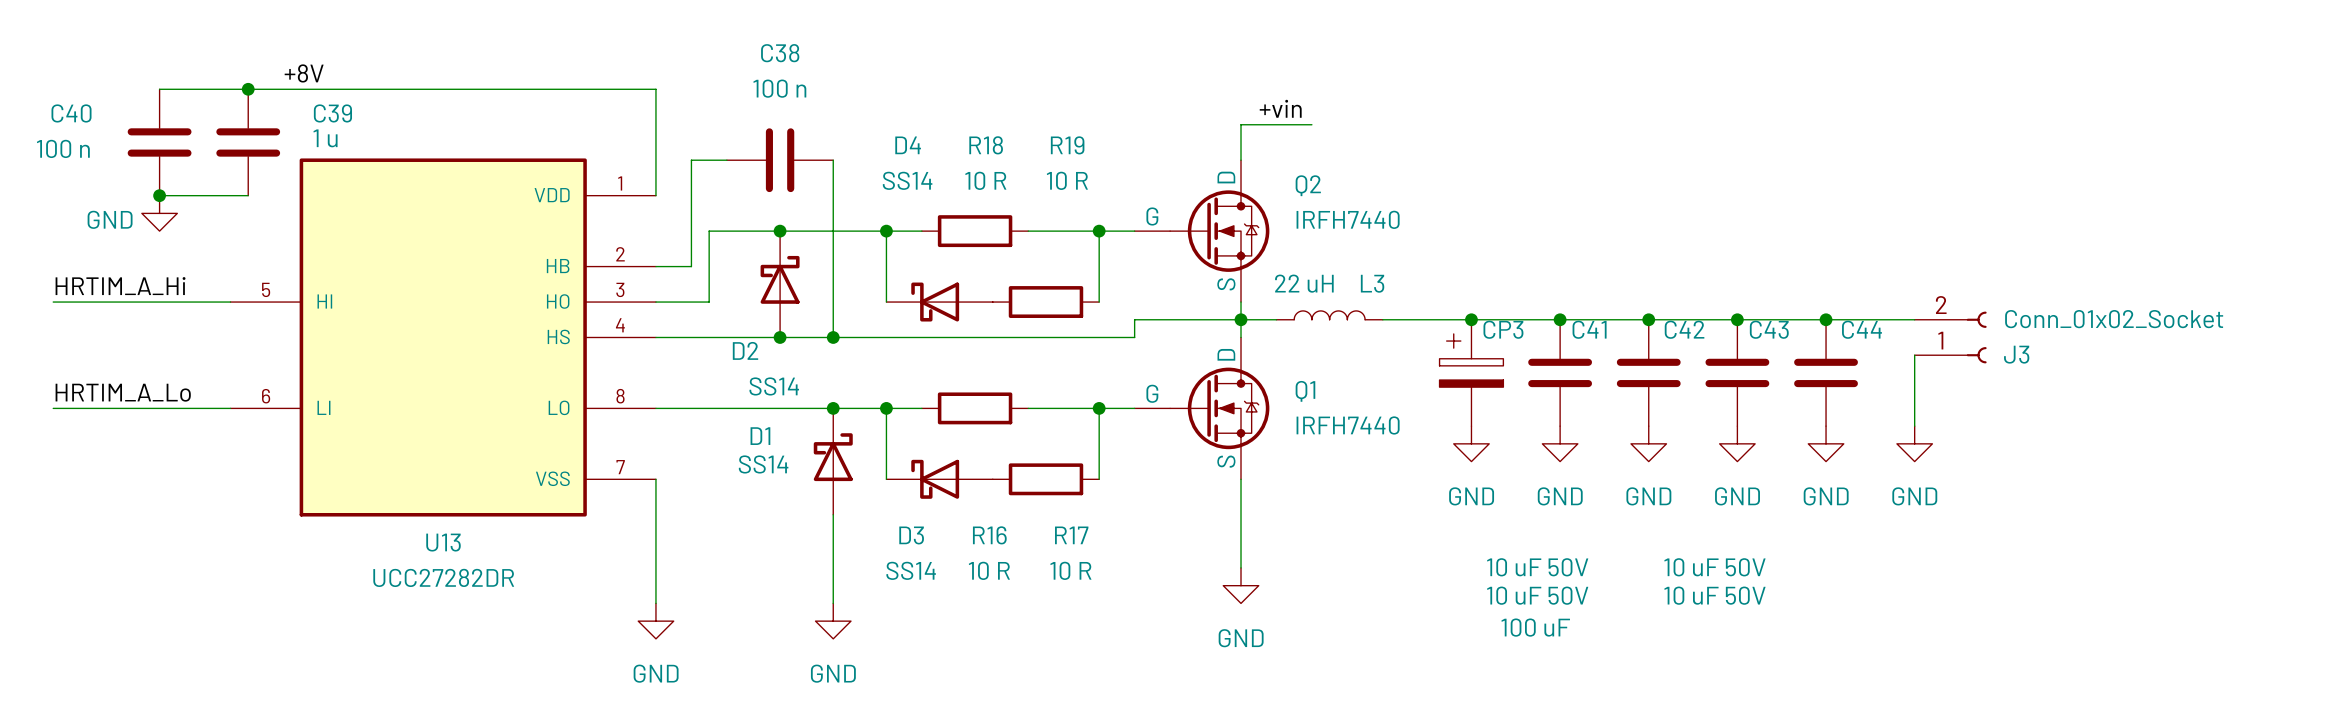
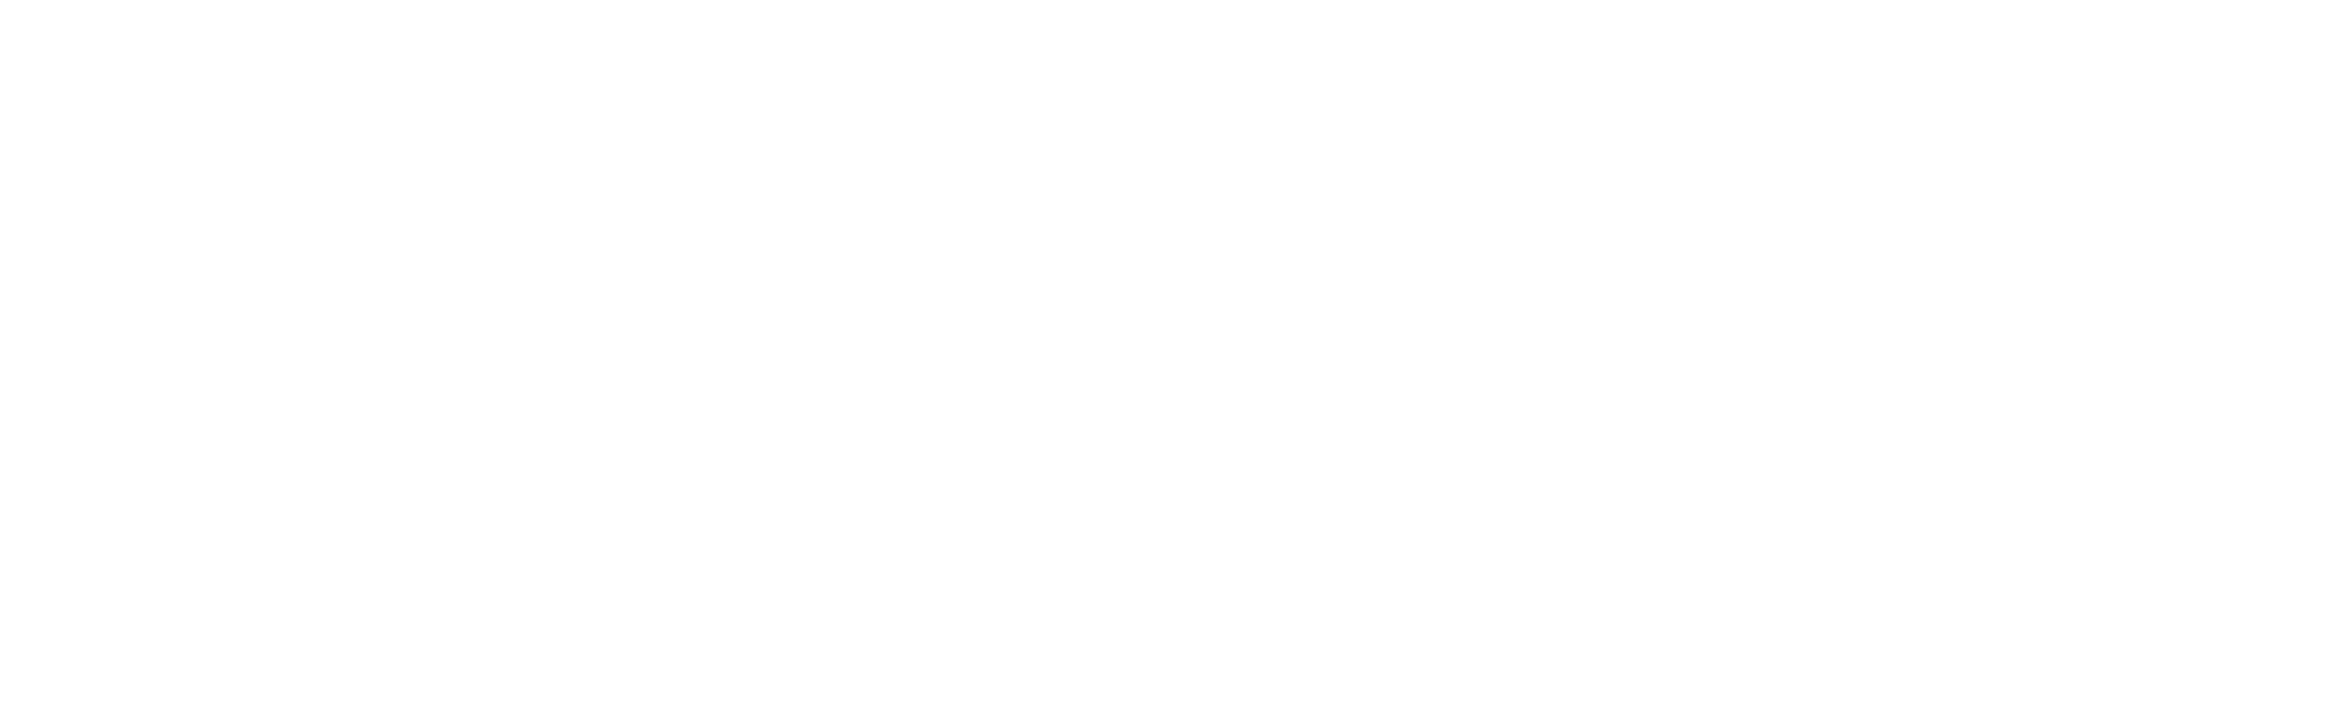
label: +8V (304, 73) -> none
wire: (159, 89) (655, 89) (655, 195) -> none
junction: (248, 89) -> none
label: +vin (1280, 108) -> none
wire: (1311, 124) (1241, 124) (1241, 160) -> none
C40: 100 n (159, 142) -> none
C39: 1 u (248, 142) -> none
wire: (726, 160) (691, 160) (691, 266) (655, 266) -> none
C38: 100 n (780, 160) -> none
wire: (833, 160) (833, 337) -> none
wire: (159, 195) (248, 195) -> none
junction: (159, 195) -> none
power symbol: GND (159, 213) -> none
junction: (780, 231) -> none
wire: (886, 231) (886, 302) -> none
junction: (886, 231) -> none
wire: (921, 231) (709, 231) (709, 302) (655, 302) -> none
R18: 10 R (975, 231) -> none
wire: (1028, 231) (1134, 231) -> none
wire: (1099, 231) (1099, 302) -> none
junction: (1099, 231) -> none
Q2: IRFH7440 (1202, 231) -> none
D2: SS14 (780, 284) -> none
label: HRTIM_A_Hi (120, 286) -> none
wire: (53, 302) (230, 302) -> none
D4: SS14 (939, 302) -> none
R19: 10 R (1045, 302) -> none
wire: (1241, 302) (1241, 337) -> none
L3: 22 uH (1329, 315) -> none
junction: (1241, 319) -> none
wire: (1276, 319) (1134, 319) (1134, 337) (655, 337) -> none
wire: (1382, 319) (1914, 319) -> none
junction: (1471, 319) -> none
junction: (1560, 319) -> none
junction: (1648, 319) -> none
junction: (1737, 319) -> none
junction: (1826, 319) -> none
U13: UCC27282DR (443, 337) -> none
junction: (780, 337) -> none
junction: (833, 337) -> none
J3: Conn_01x02_Socket (1950, 337) -> none
wire: (1914, 355) (1914, 426) -> none
CP3: 100 uF (1471, 372) -> none
C41: 10 uF 50V (1560, 372) -> none
C42: 10 uF 50V (1648, 372) -> none
C43: 10 uF 50V (1737, 372) -> none
C44: 10 uF 50V (1826, 372) -> none
label: HRTIM_A_Lo (123, 392) -> none
wire: (53, 408) (230, 408) -> none
wire: (655, 408) (921, 408) -> none
junction: (833, 408) -> none
wire: (886, 408) (886, 479) -> none
junction: (886, 408) -> none
R16: 10 R (975, 408) -> none
wire: (1028, 408) (1134, 408) -> none
wire: (1099, 408) (1099, 479) -> none
junction: (1099, 408) -> none
Q1: IRFH7440 (1202, 408) -> none
power symbol: GND (1471, 443) -> none
power symbol: GND (1560, 443) -> none
power symbol: GND (1648, 443) -> none
power symbol: GND (1737, 443) -> none
power symbol: GND (1826, 443) -> none
power symbol: GND (1914, 443) -> none
D1: SS14 (833, 461) -> none
wire: (655, 479) (655, 603) -> none
D3: SS14 (939, 479) -> none
R17: 10 R (1045, 479) -> none
wire: (1241, 479) (1241, 567) -> none
wire: (833, 514) (833, 603) -> none
power symbol: GND (1241, 585) -> none
power symbol: GND (655, 621) -> none
power symbol: GND (833, 621) -> none

